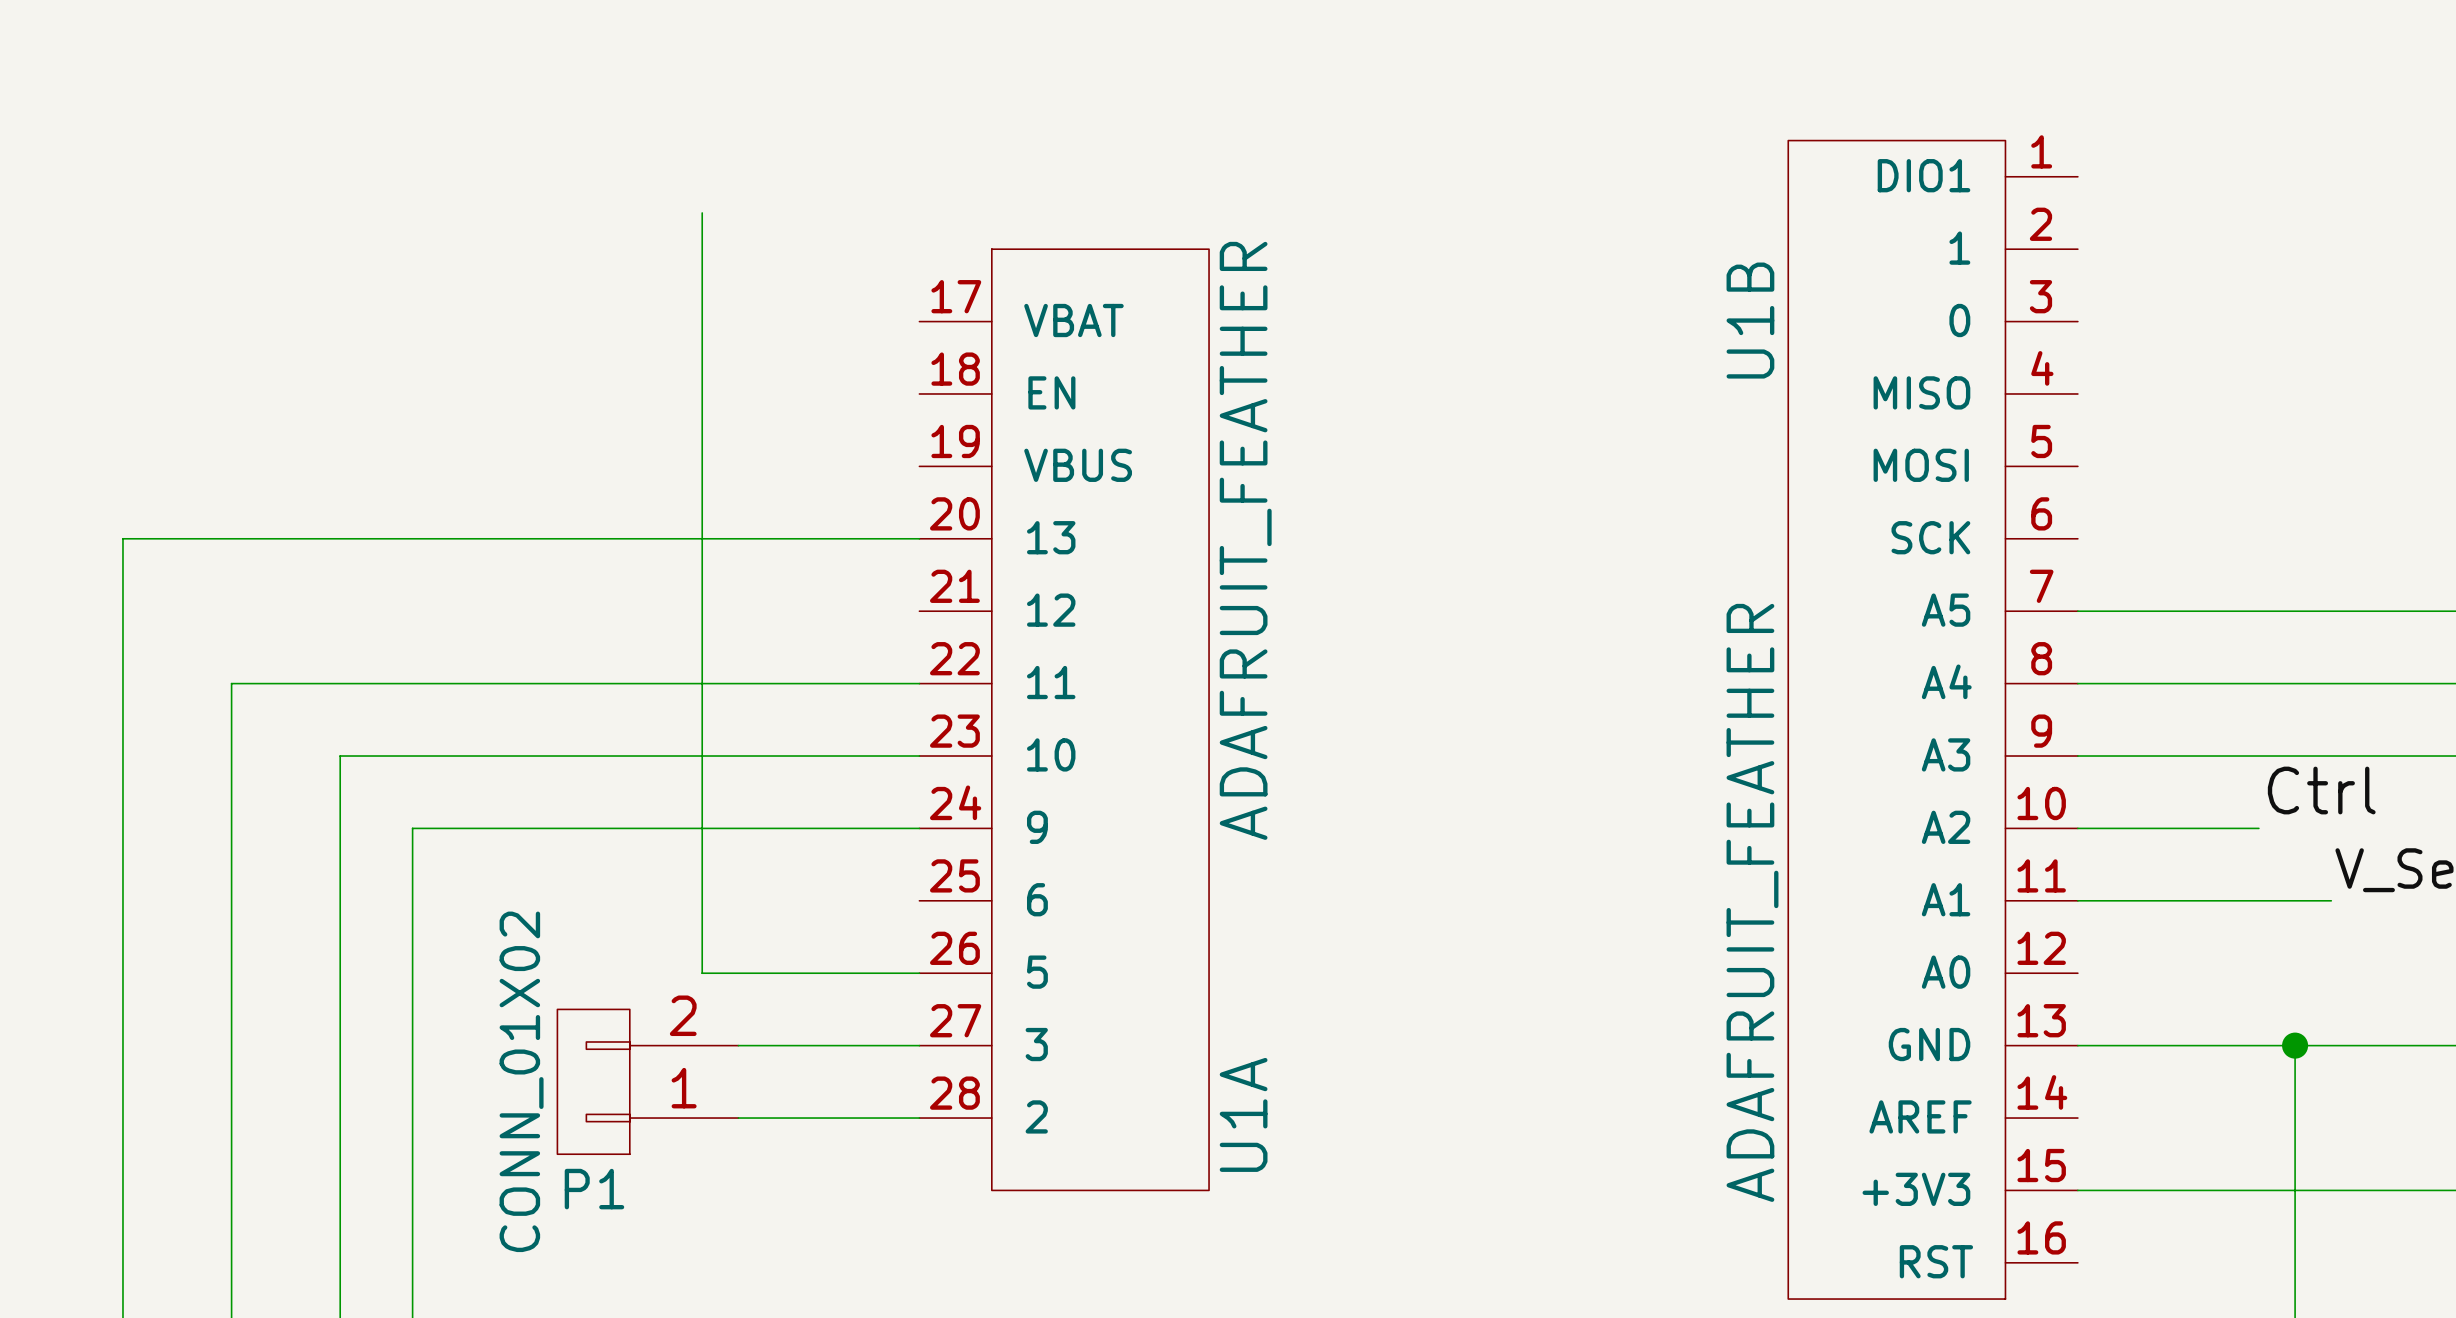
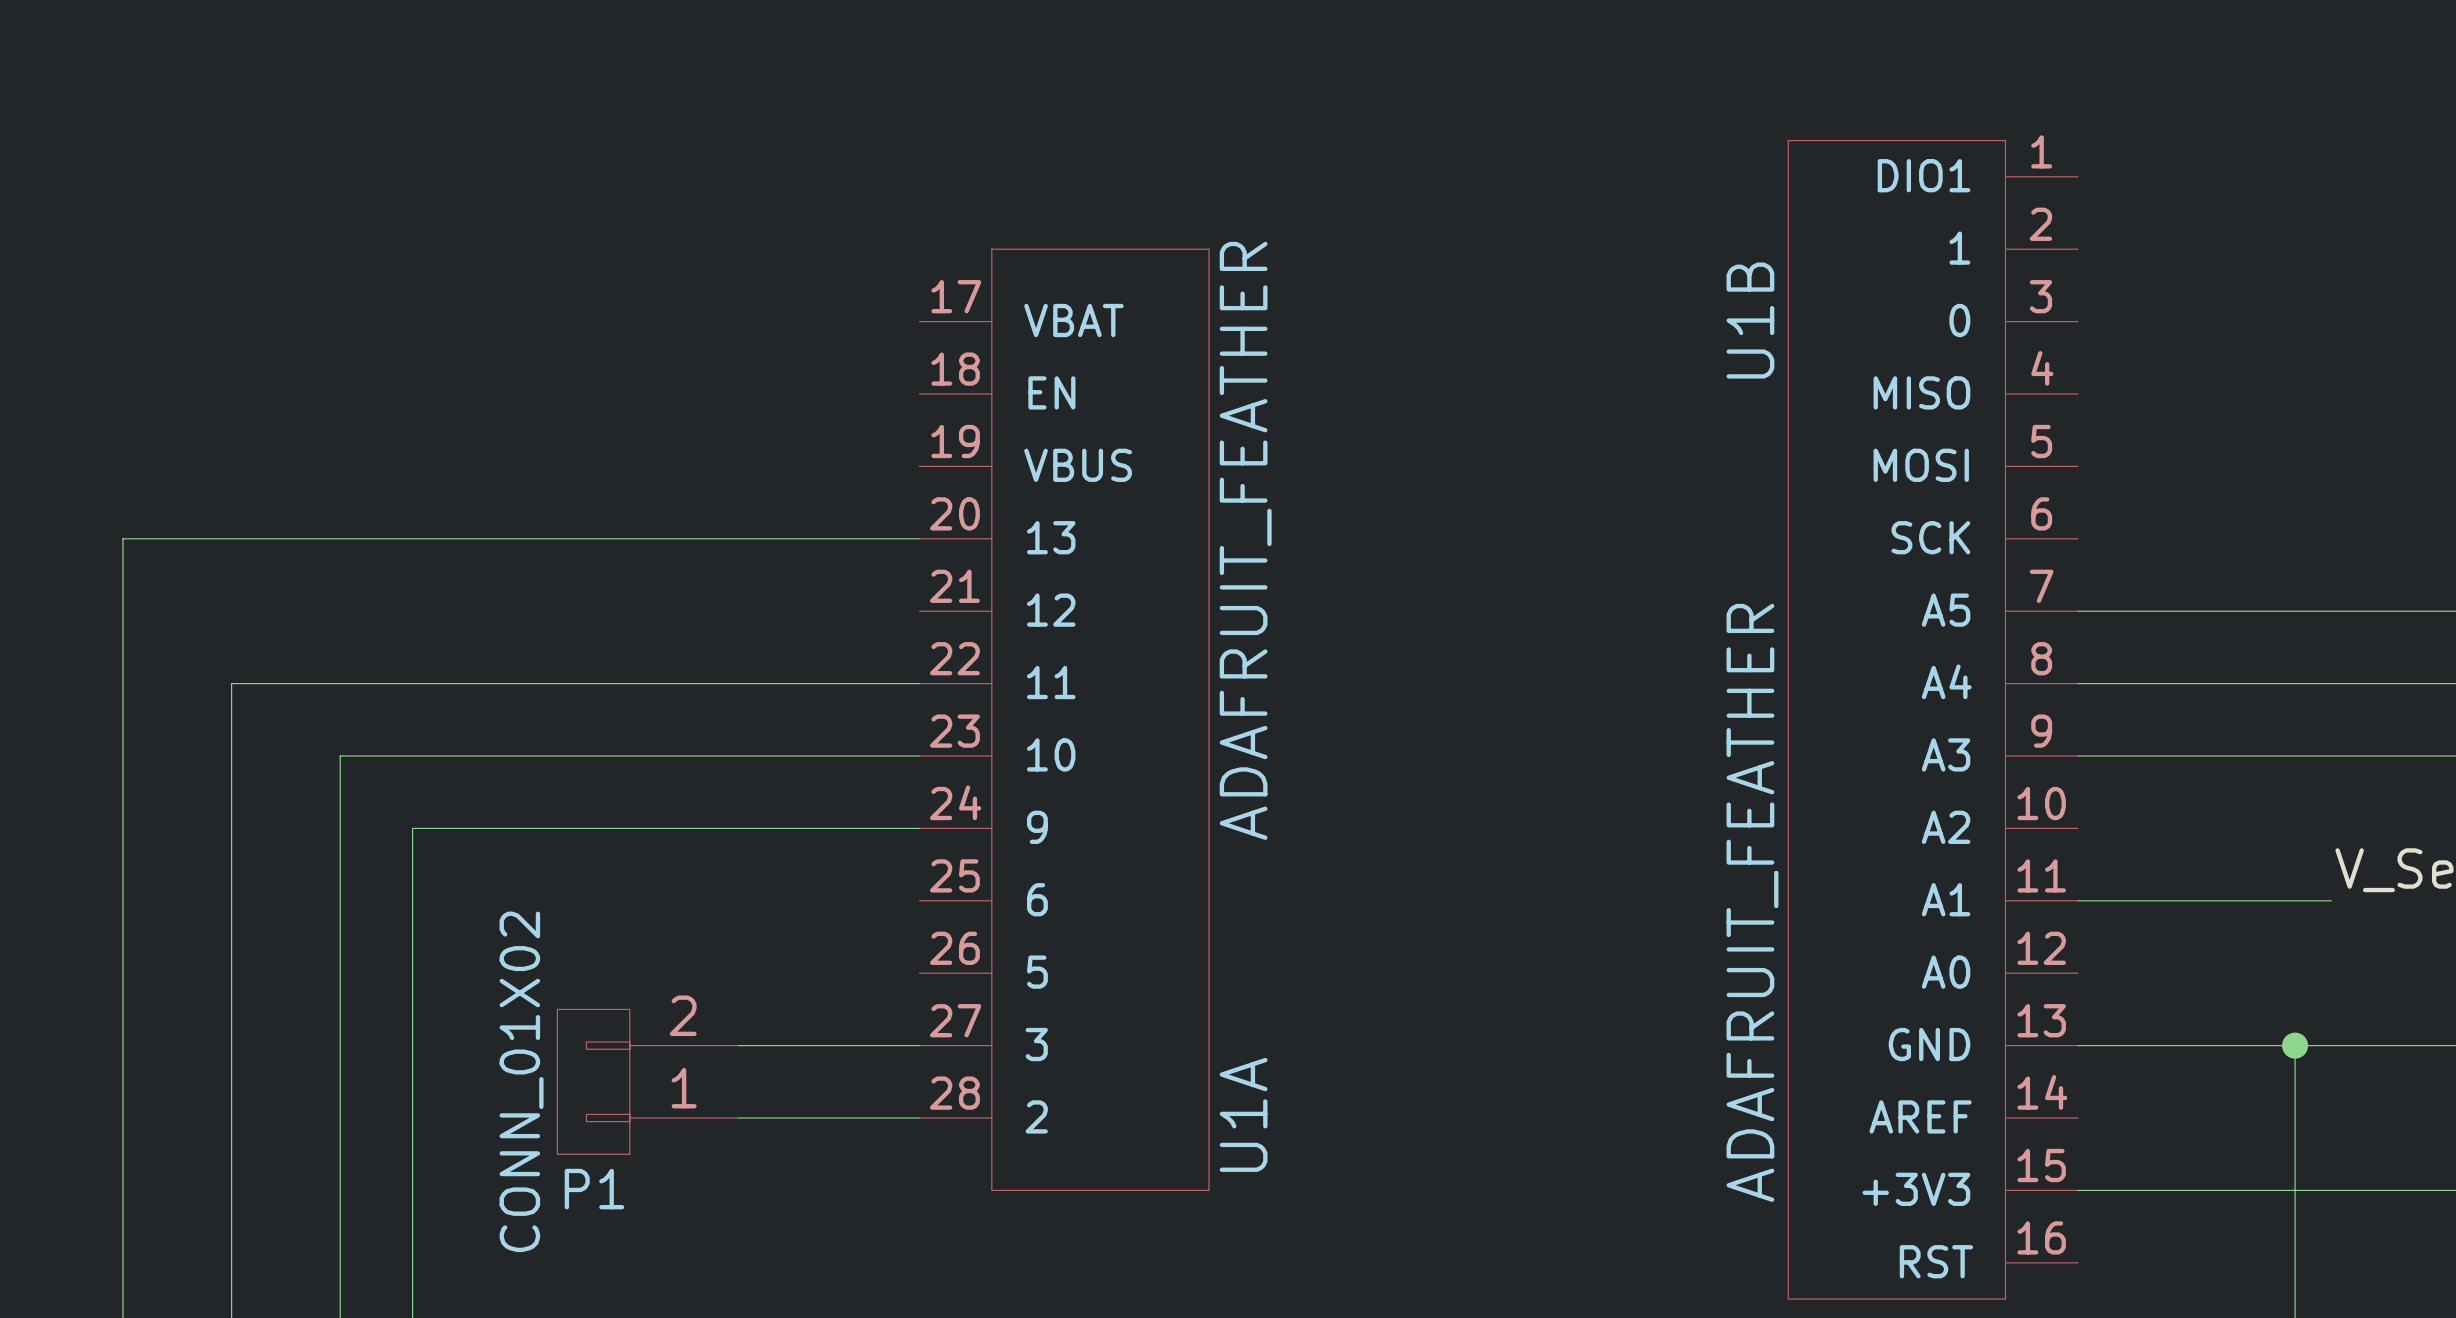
wire: (702, 212) (702, 973) (919, 973) -> none
label: Ctrl (2321, 790) -> none
wire: (2077, 828) (2258, 828) -> none

